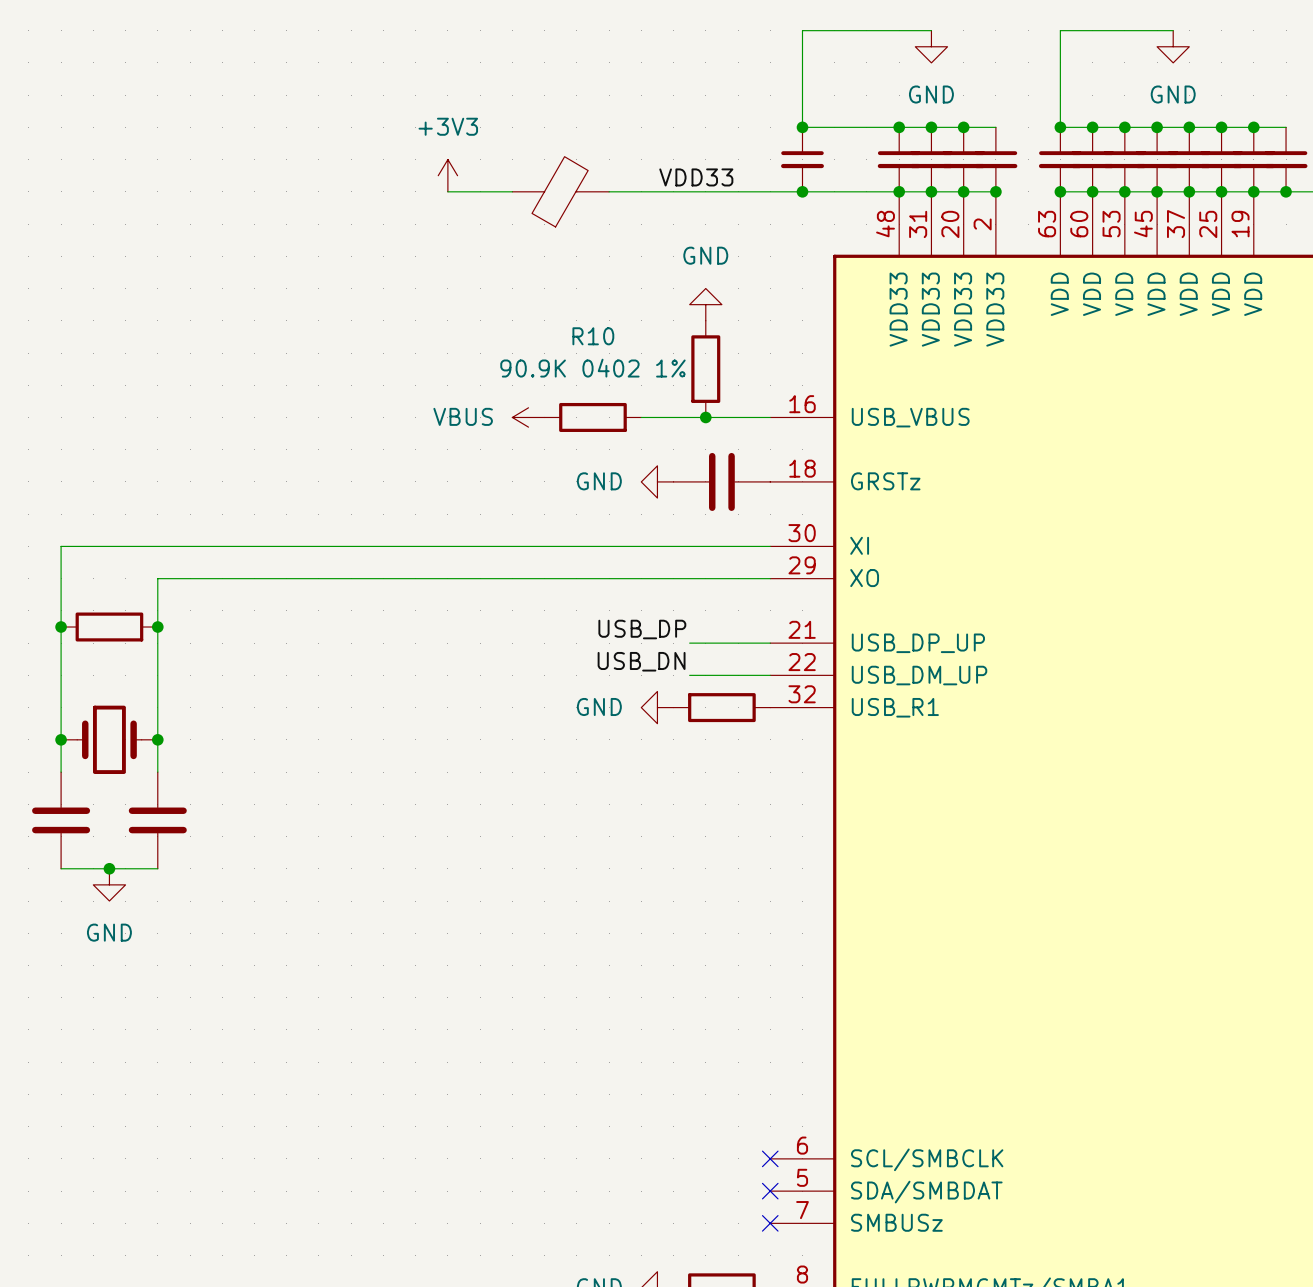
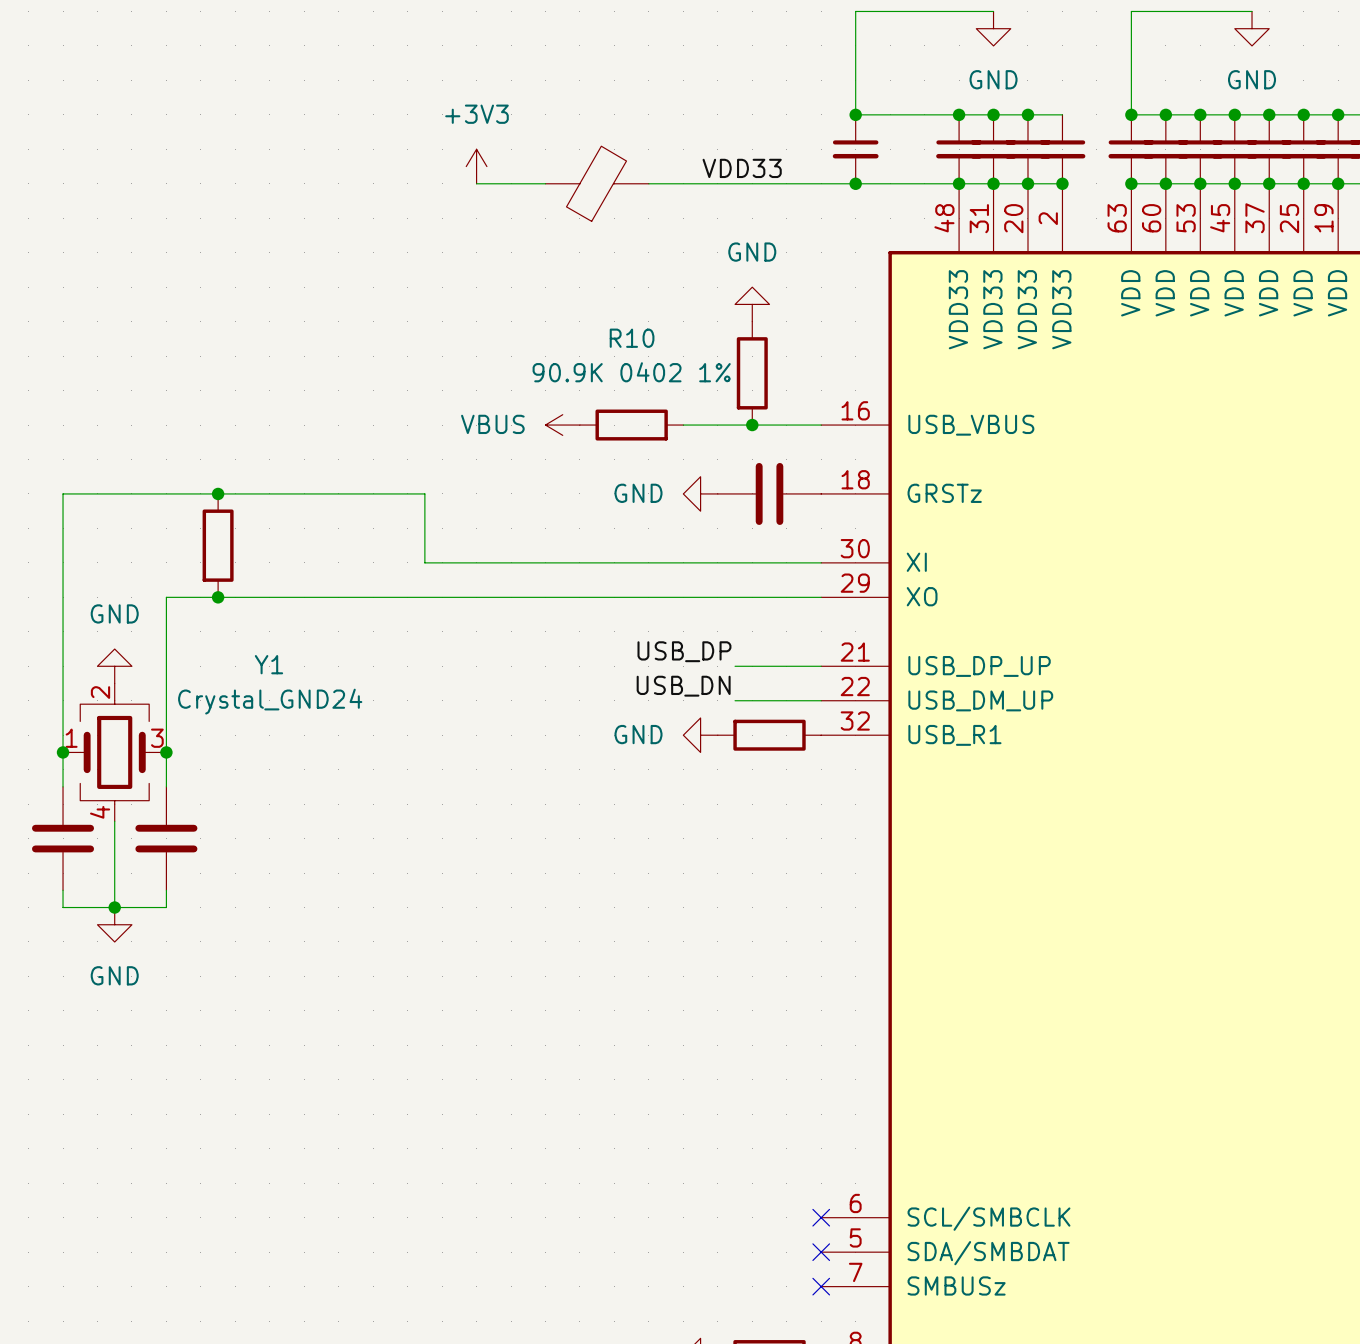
junction: none -> (218, 493)
wire: (61, 546) (399, 546) -> (63, 562) (63, 493) (424, 493) (424, 562)
junction: none -> (218, 597)
junction: (61, 627) -> none
part rotation: 0° (109, 627) -> 90° clockwise (218, 545)
part position: (109, 627) -> (218, 545)
junction: (157, 627) -> none
power symbol: none -> GND (114, 666)
Y1: none -> Crystal_GND24 (114, 752)
junction position: (61, 739) -> (63, 752)
part: (109, 739) -> none
junction position: (157, 739) -> (166, 752)
wire: none -> (114, 821) (114, 907)
part position: (61, 820) -> (63, 838)
part position: (157, 820) -> (166, 838)

